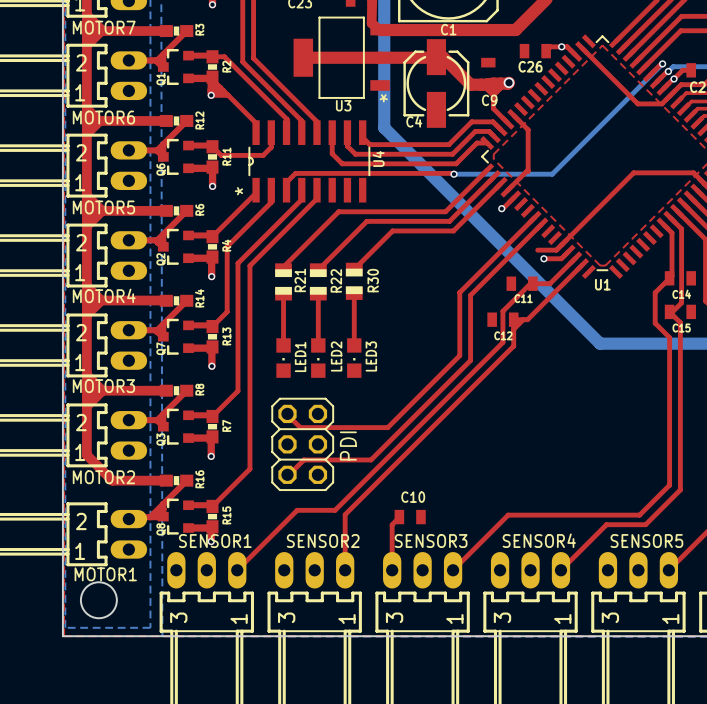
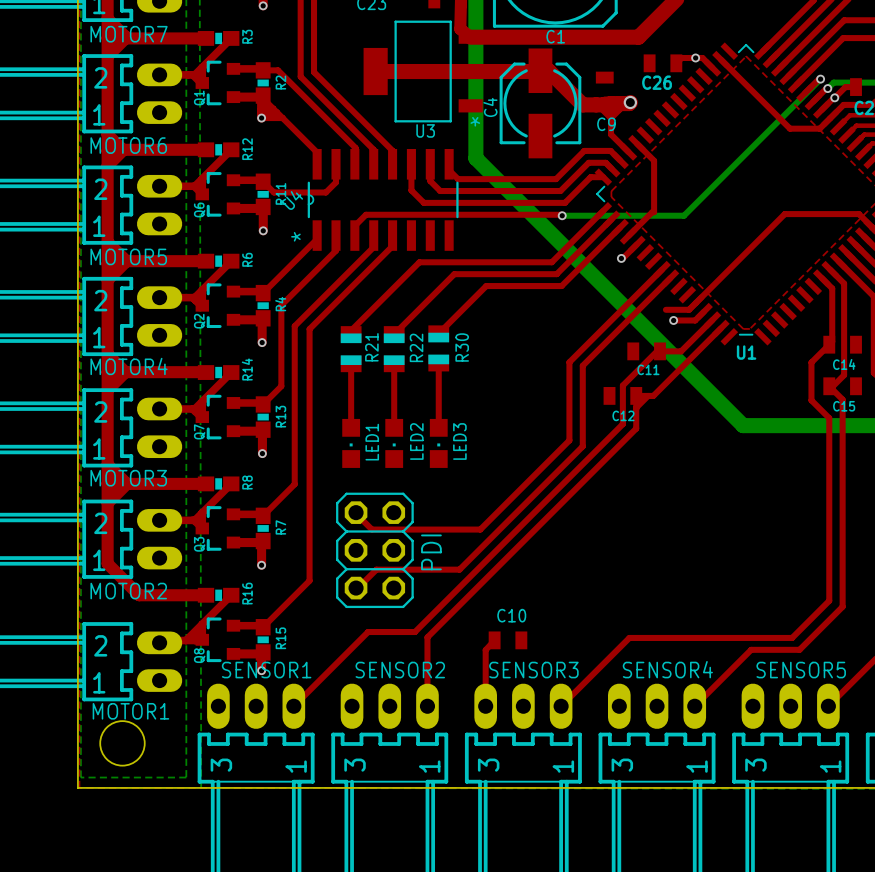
C4 name rotation: 0° (414, 121) -> 90° counterclockwise (490, 107)
C4 name position: C4 (414, 121) -> C4 (490, 107)
U4 name rotation: 0° (378, 158) -> 45° clockwise (292, 200)
U4 name position: U4 (378, 158) -> U4 (292, 200)

